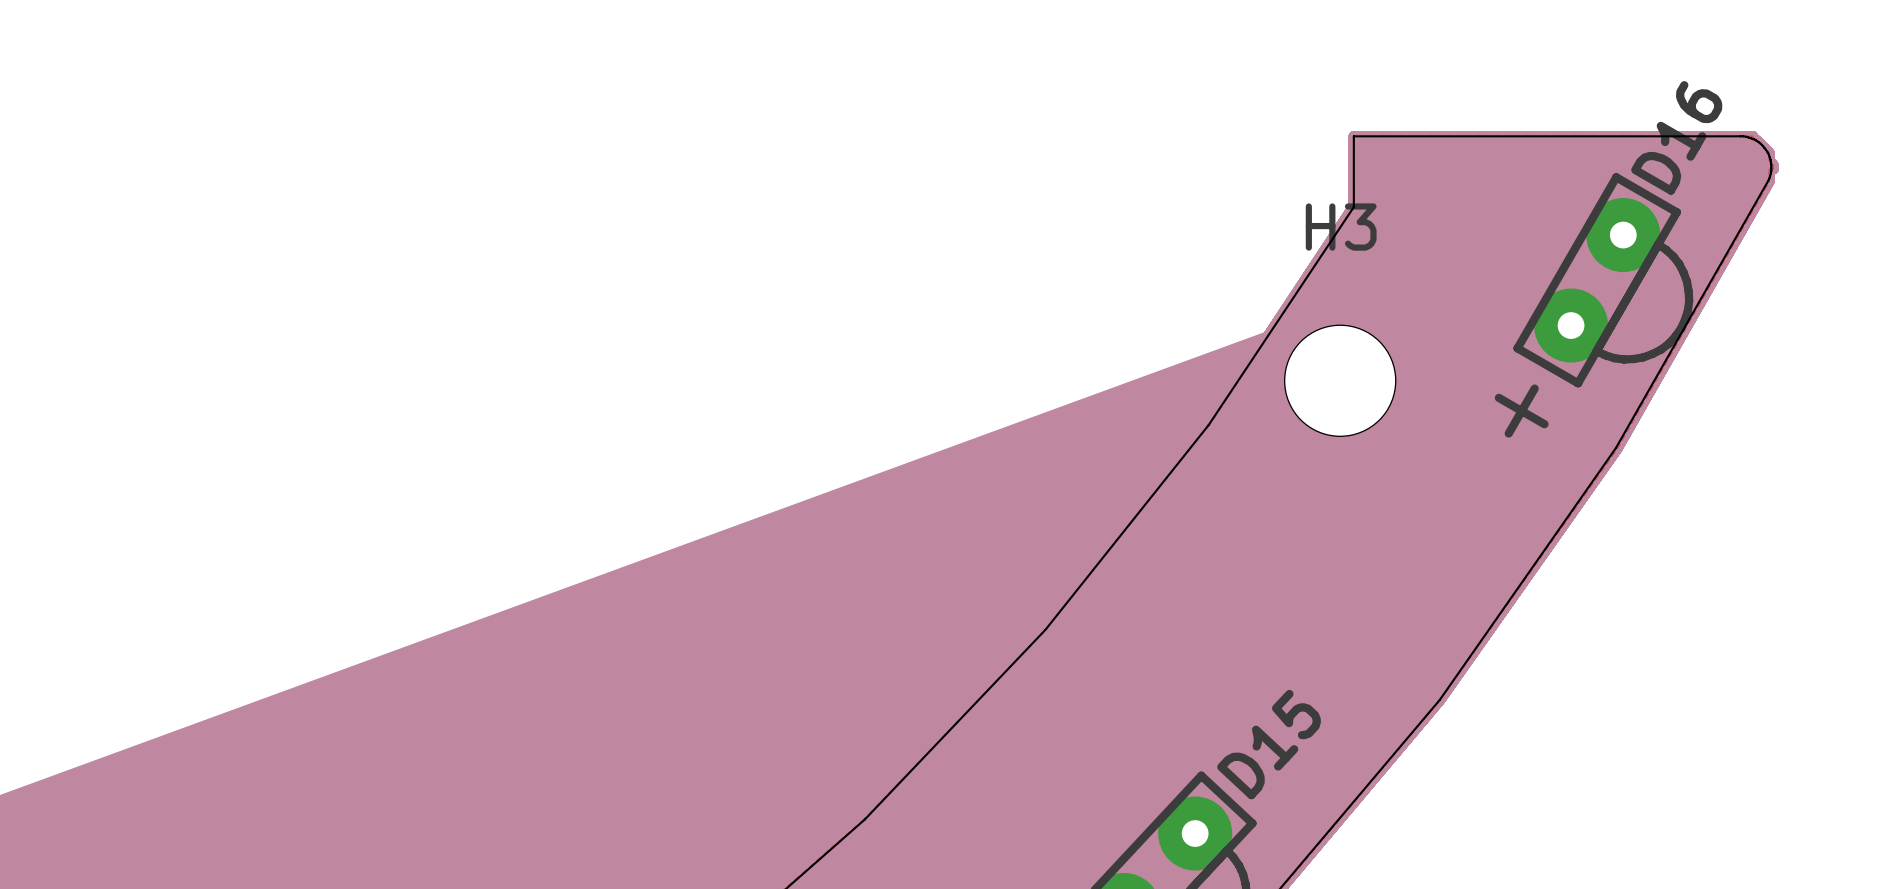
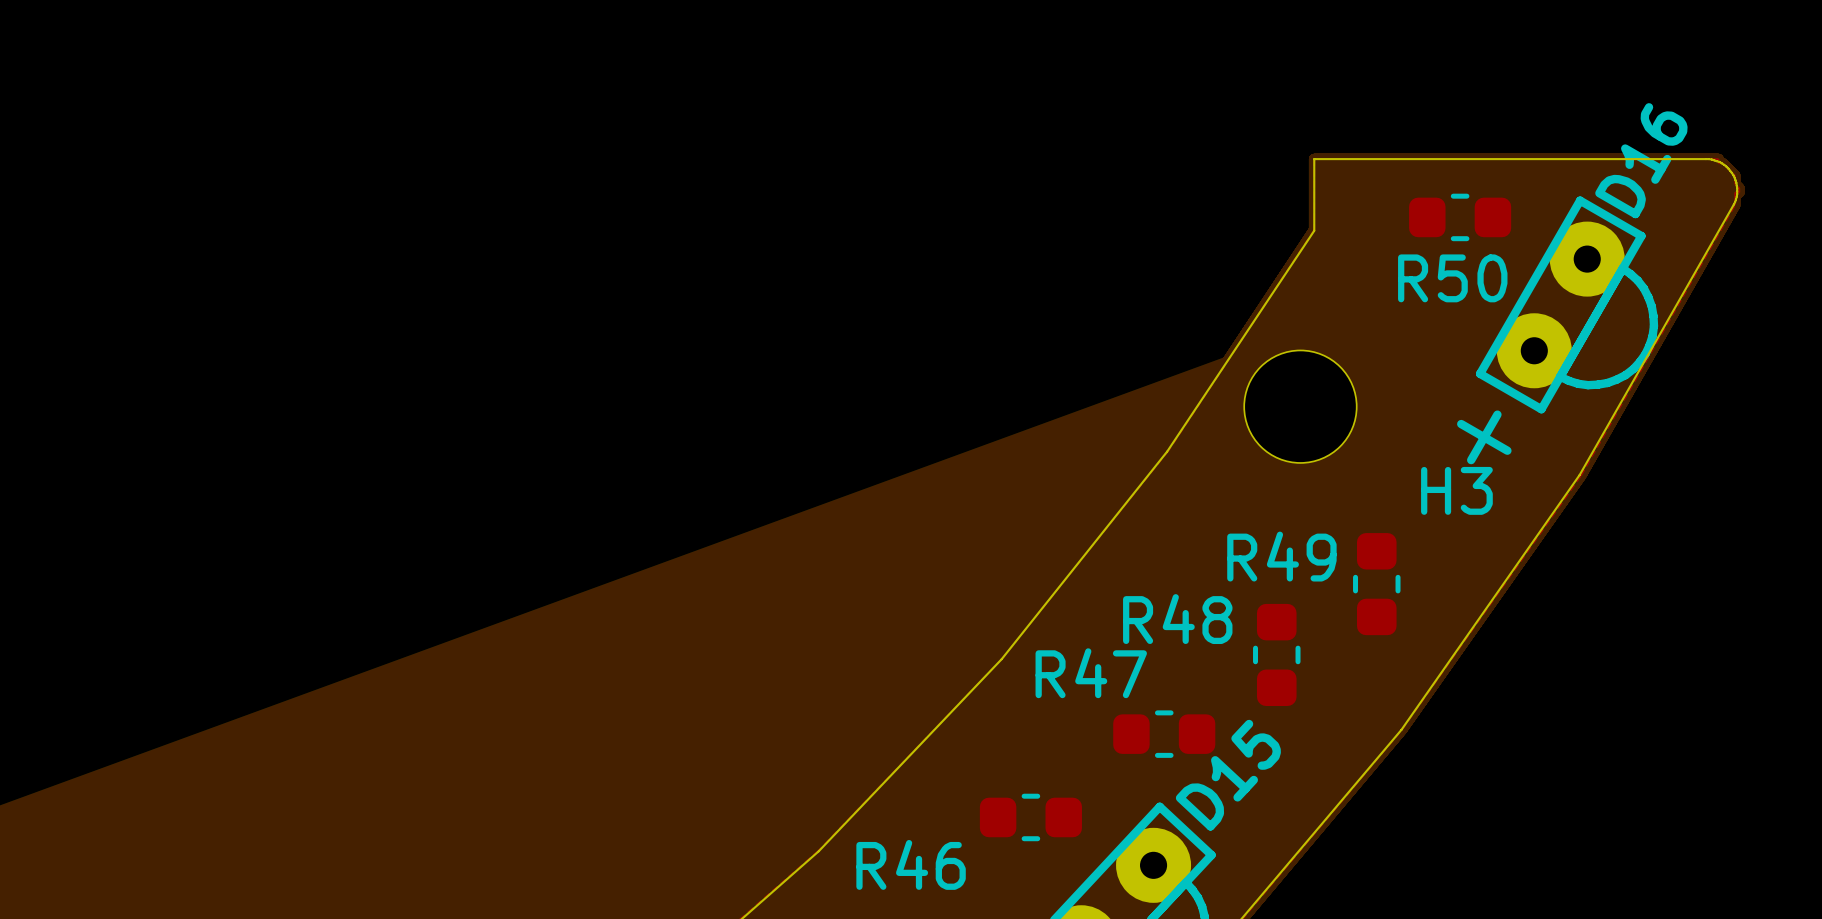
R50: none -> (1460, 217)
H3 name position: H3 (1341, 227) -> H3 (1456, 490)
R49: none -> (1376, 584)
R48: none -> (1276, 654)
R47: none -> (1164, 734)
R46: none -> (1030, 817)

